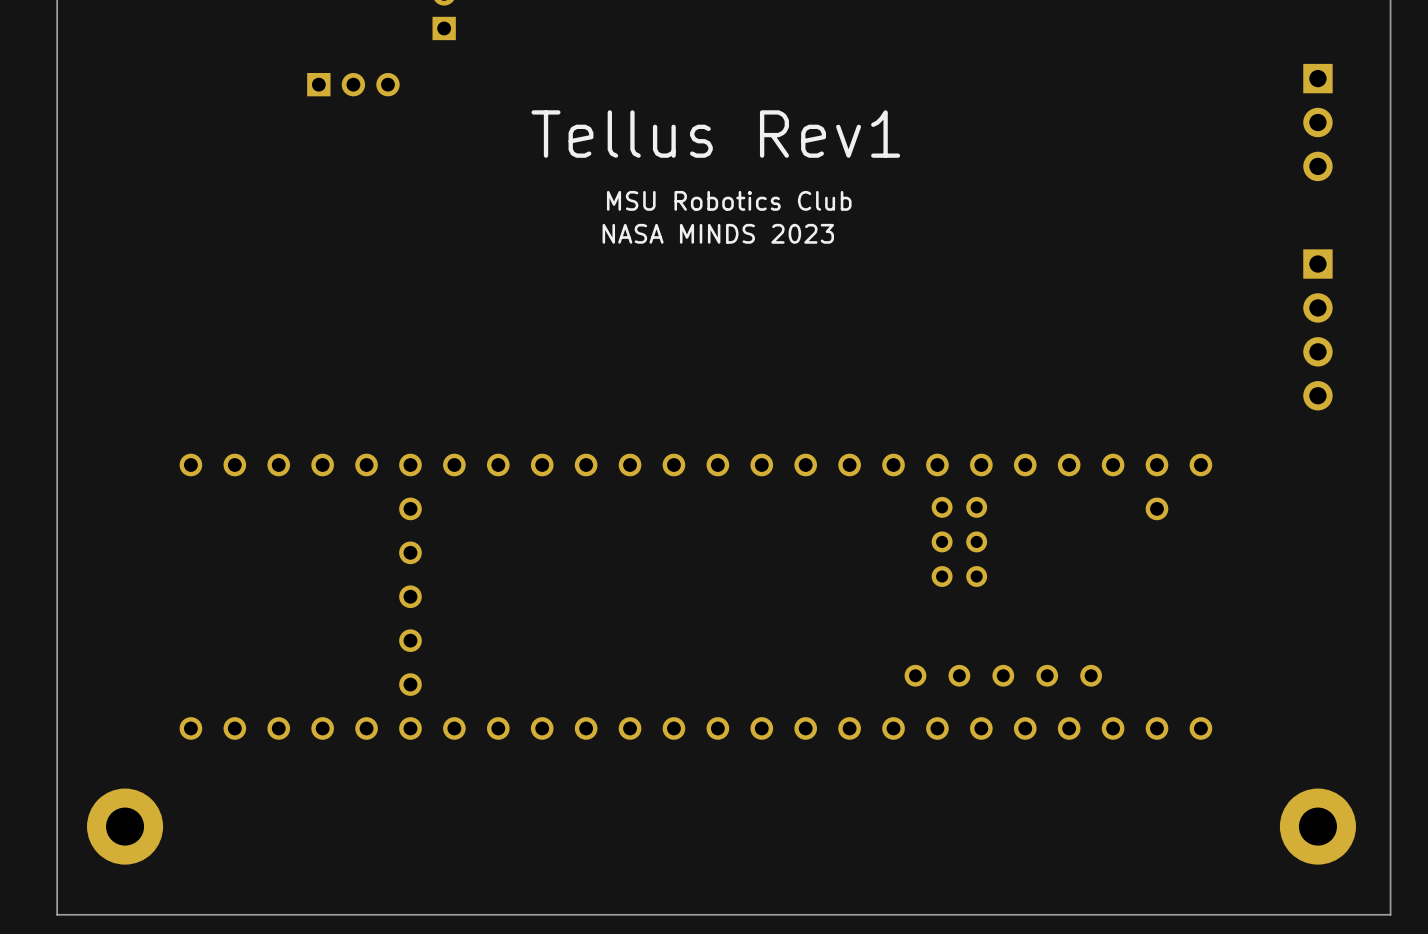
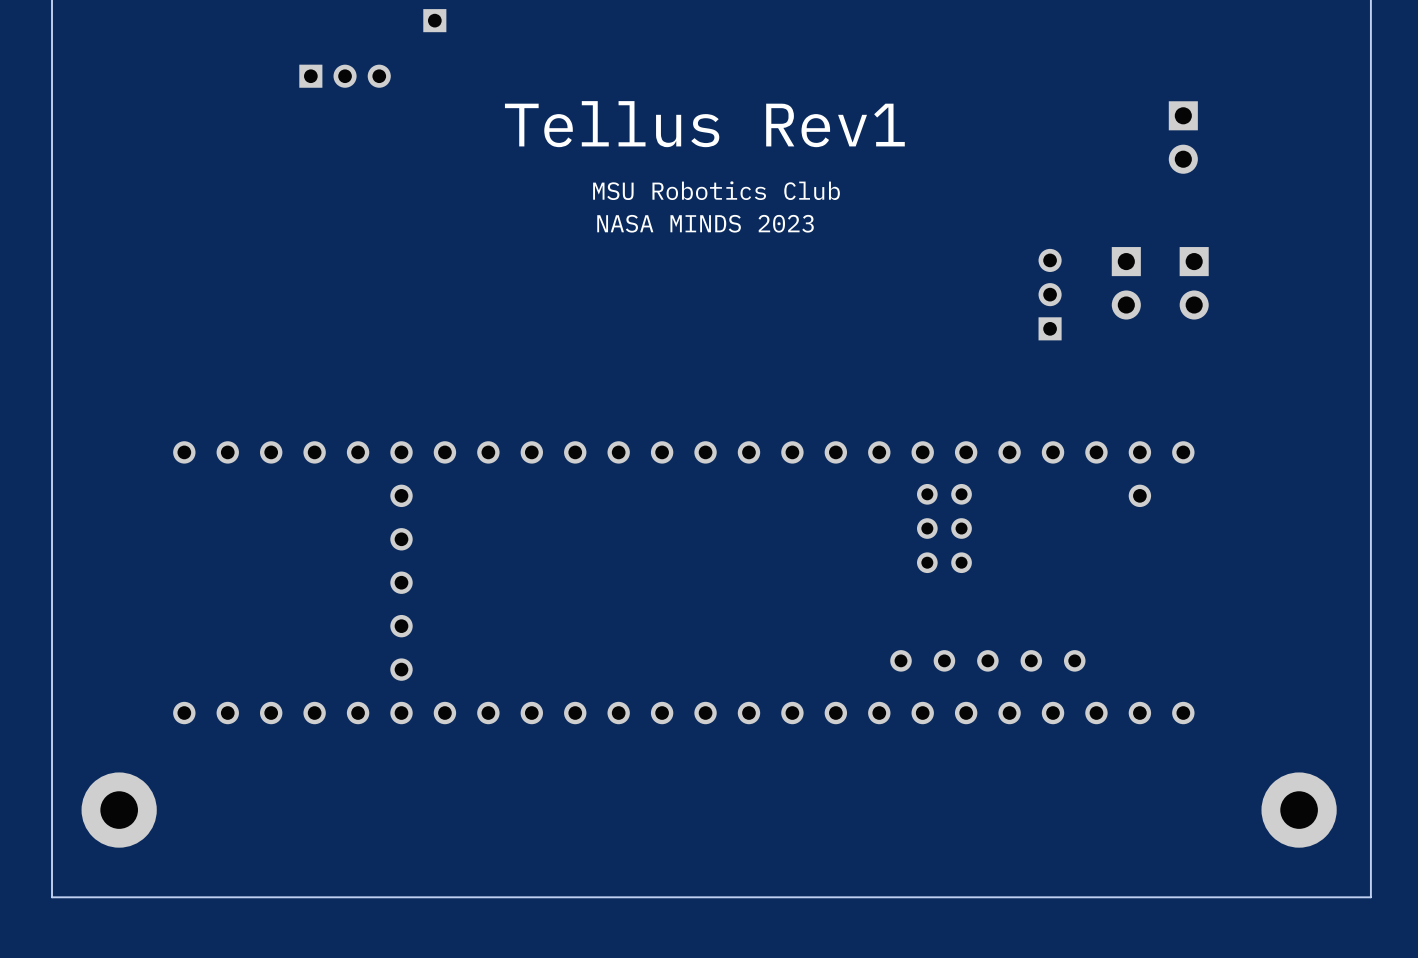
part: (1317, 122) -> none
part: none -> (1183, 137)
part: none -> (1126, 283)
part: none -> (1194, 283)
part: none -> (1050, 294)
part: (1317, 329) -> none

